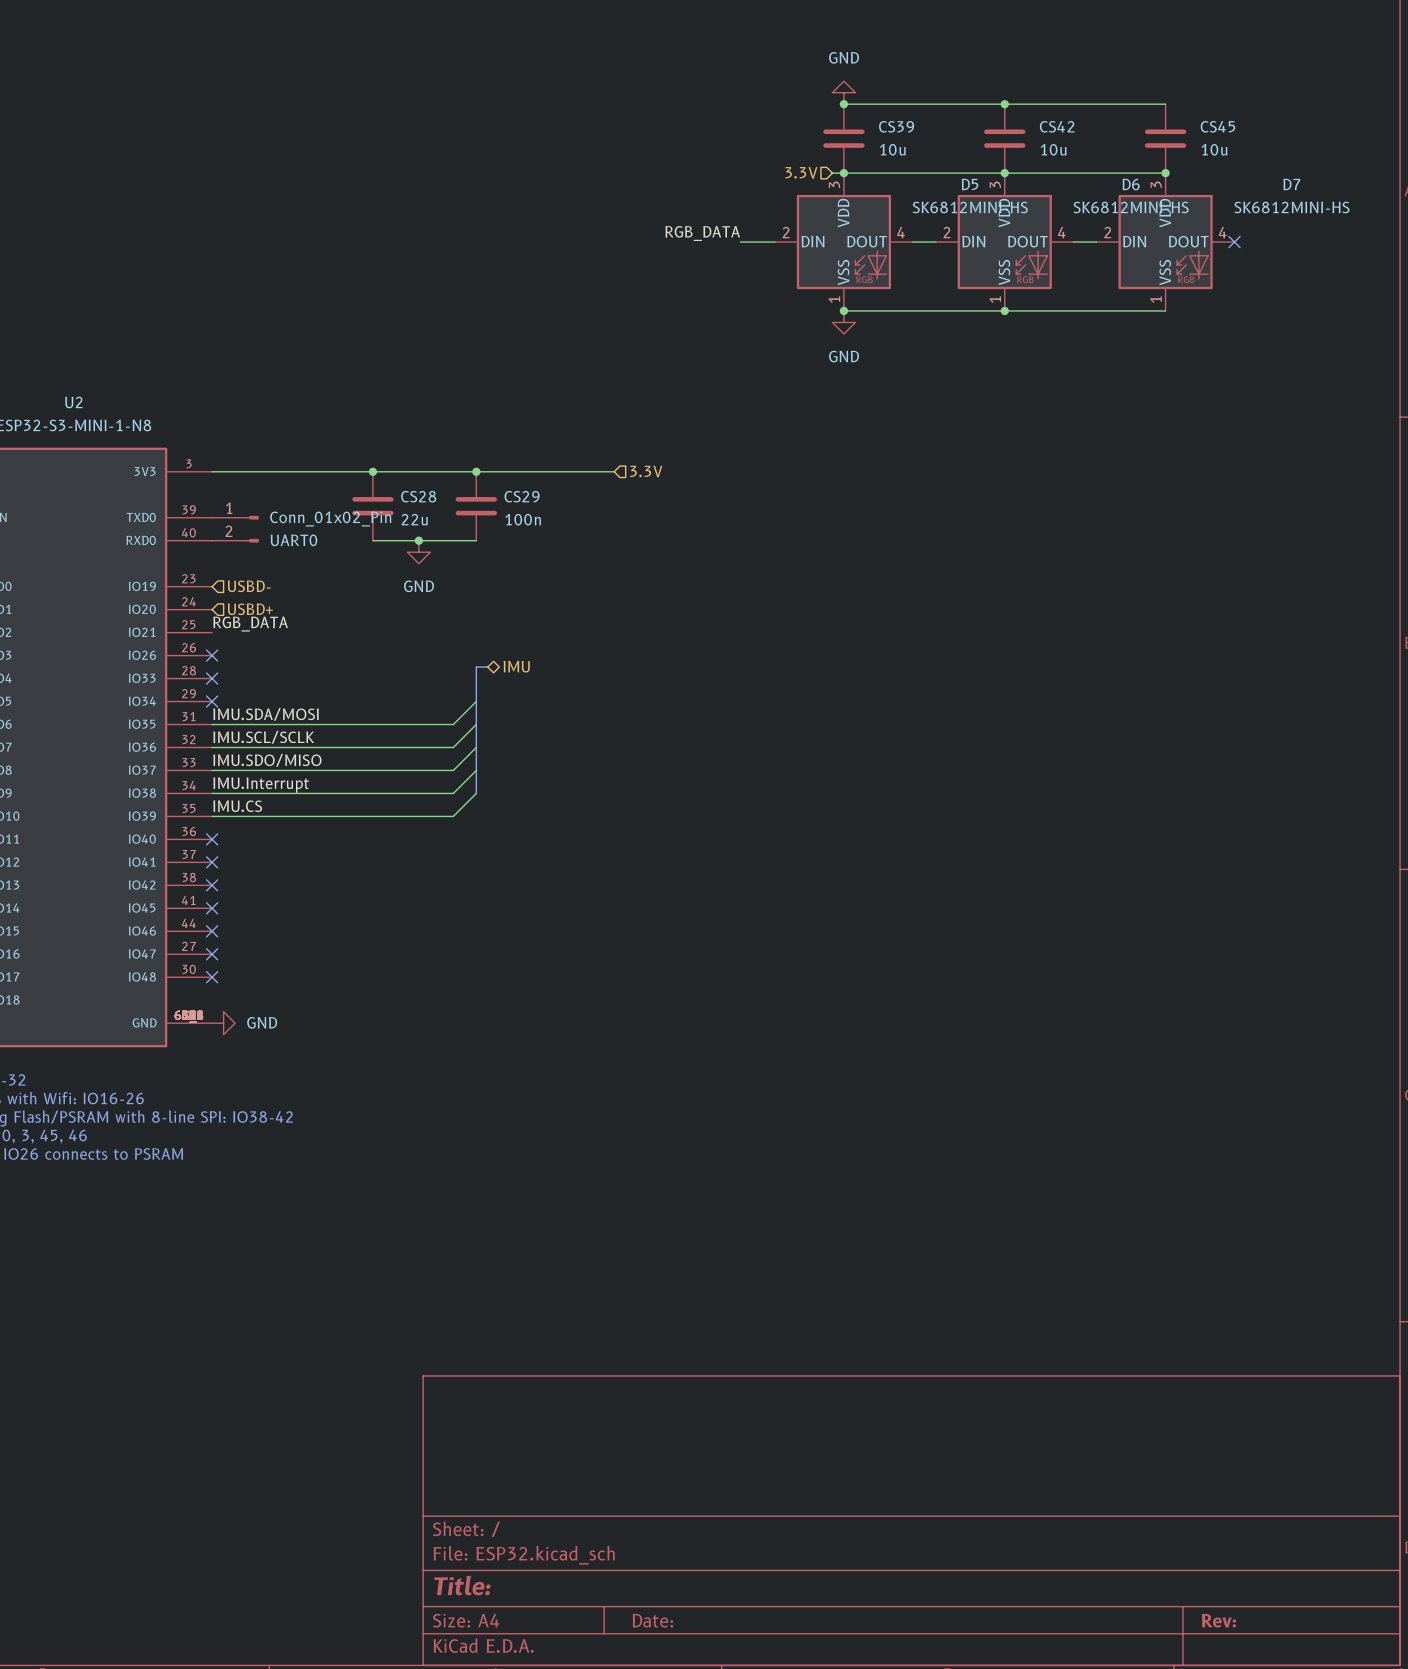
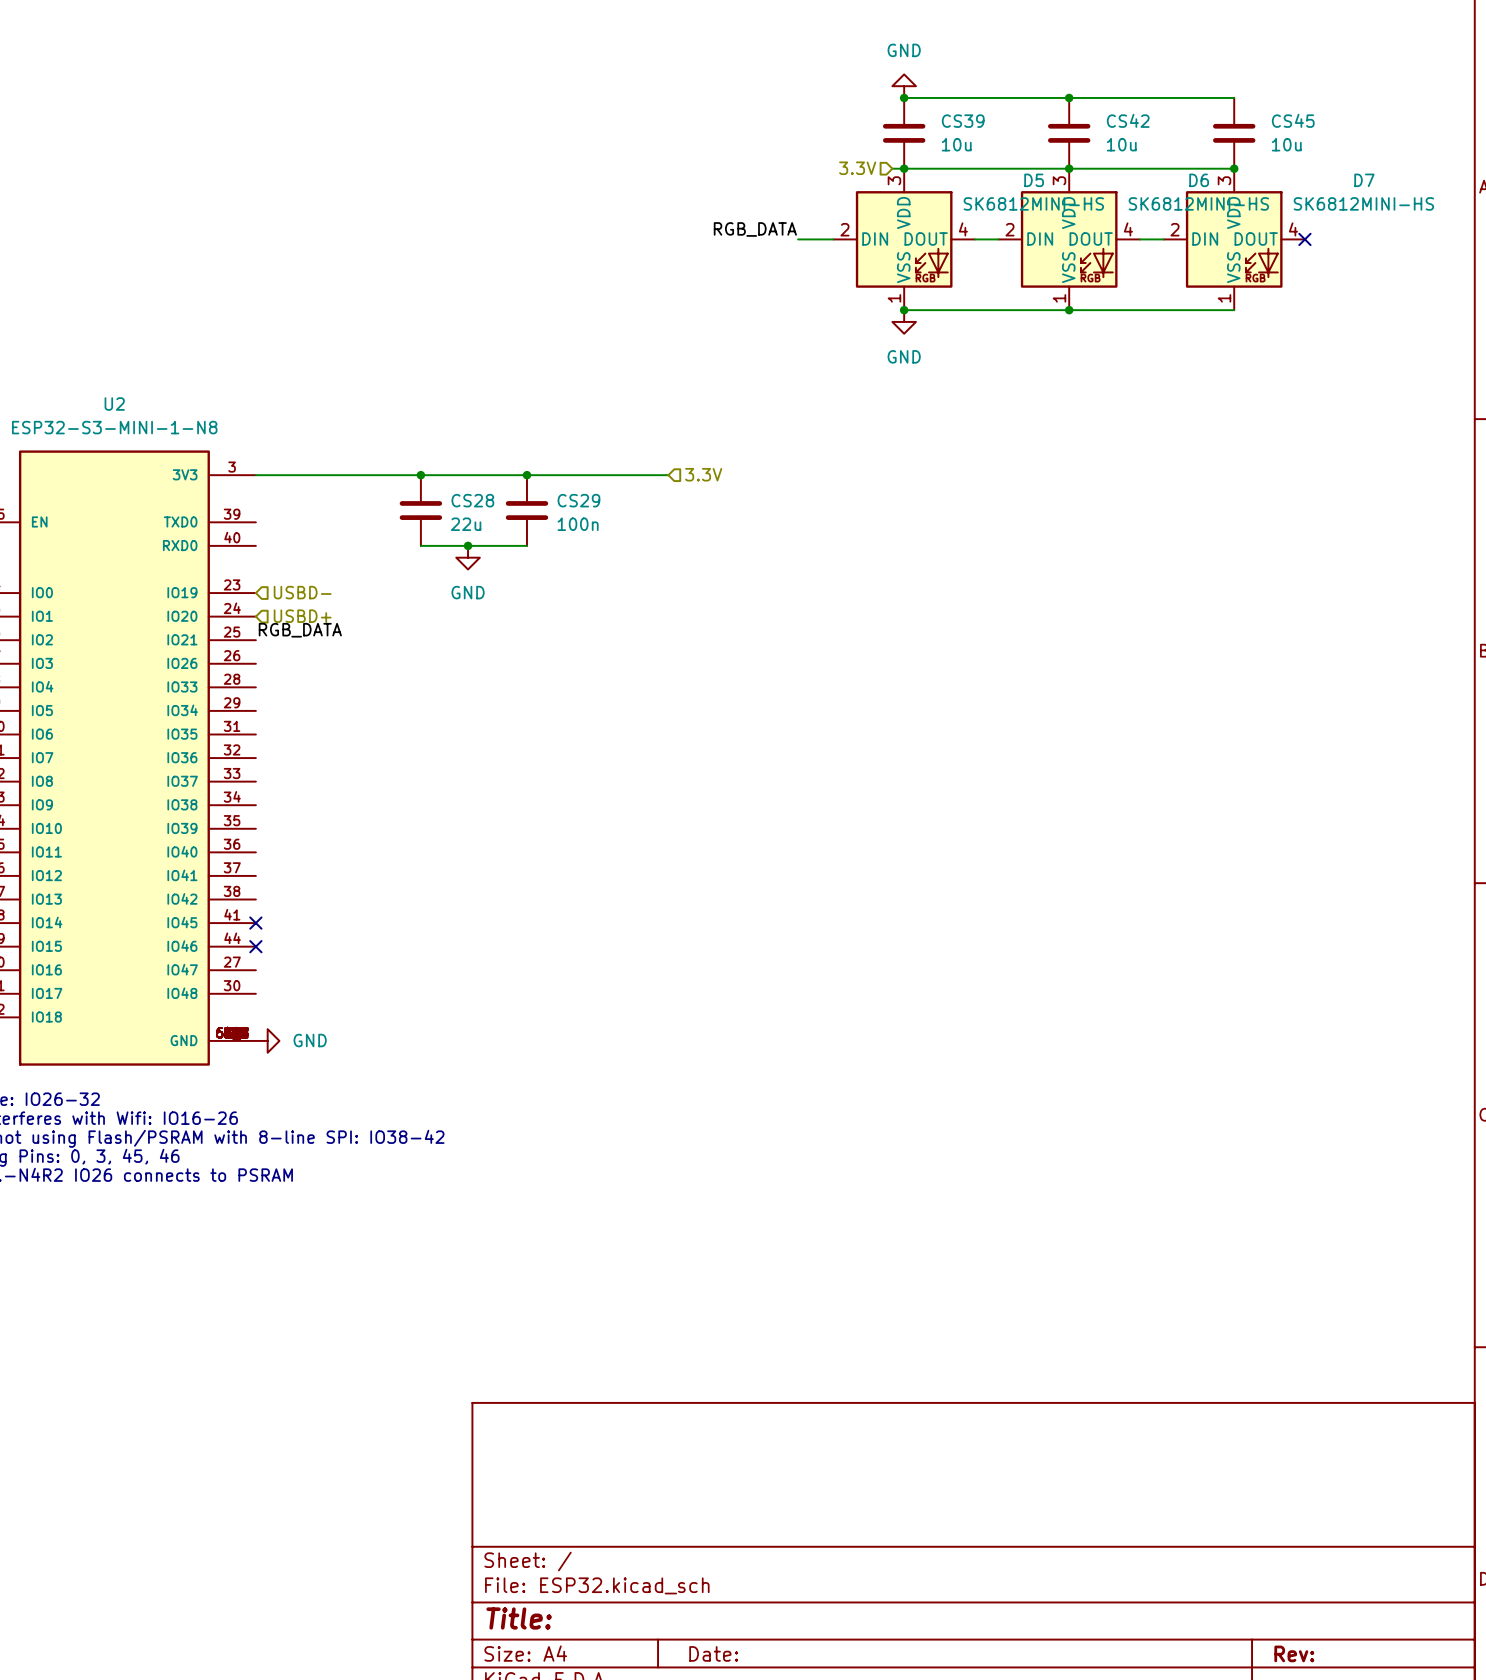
UART0: Conn_01x02_Pin (235, 529) -> none
no-connect mark: (212, 655) -> none
hierarchical label: IMU (516, 666) -> none
bus: (487, 667) (476, 667) (476, 793) -> none
no-connect mark: (212, 678) -> none
no-connect mark: (212, 701) -> none
wire: (476, 701) (453, 724) (212, 724) -> none
label: IMU.SDA/MOSI (265, 714) -> none
wire: (476, 724) (453, 747) (212, 747) -> none
label: IMU.SCL/SCLK (263, 737) -> none
wire: (476, 747) (453, 770) (212, 770) -> none
label: IMU.SDO/MISO (267, 760) -> none
wire: (476, 770) (453, 793) (212, 793) -> none
label: IMU.Interrupt (261, 785) -> none
wire: (476, 793) (453, 816) (212, 816) -> none
label: IMU.CS (237, 806) -> none
no-connect mark: (212, 839) -> none
no-connect mark: (212, 862) -> none
no-connect mark: (212, 885) -> none
no-connect mark: (212, 954) -> none
no-connect mark: (212, 977) -> none

